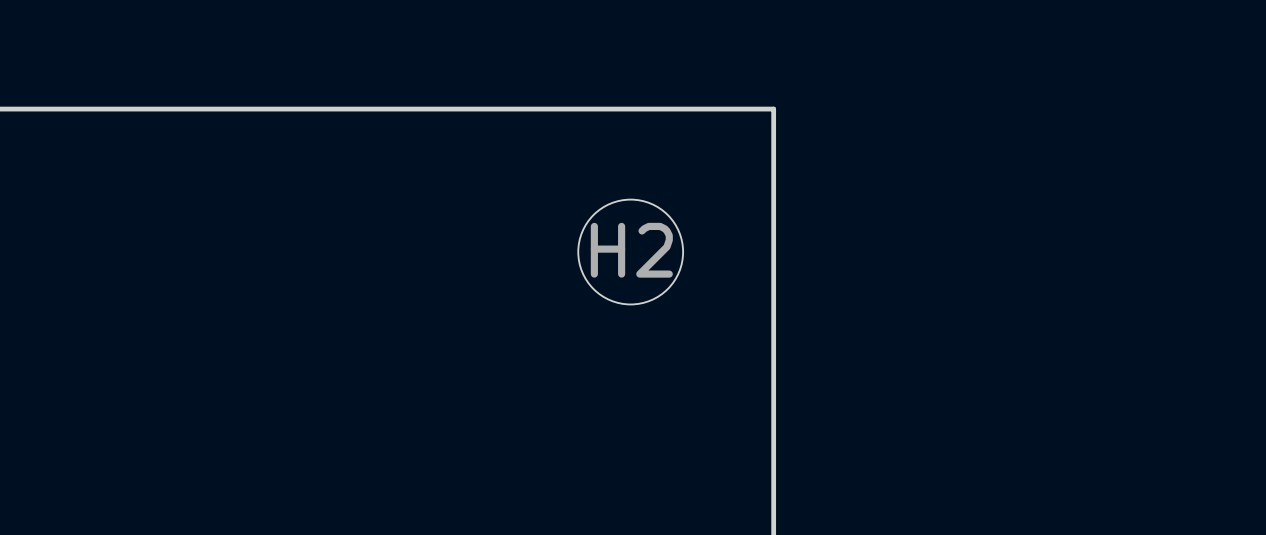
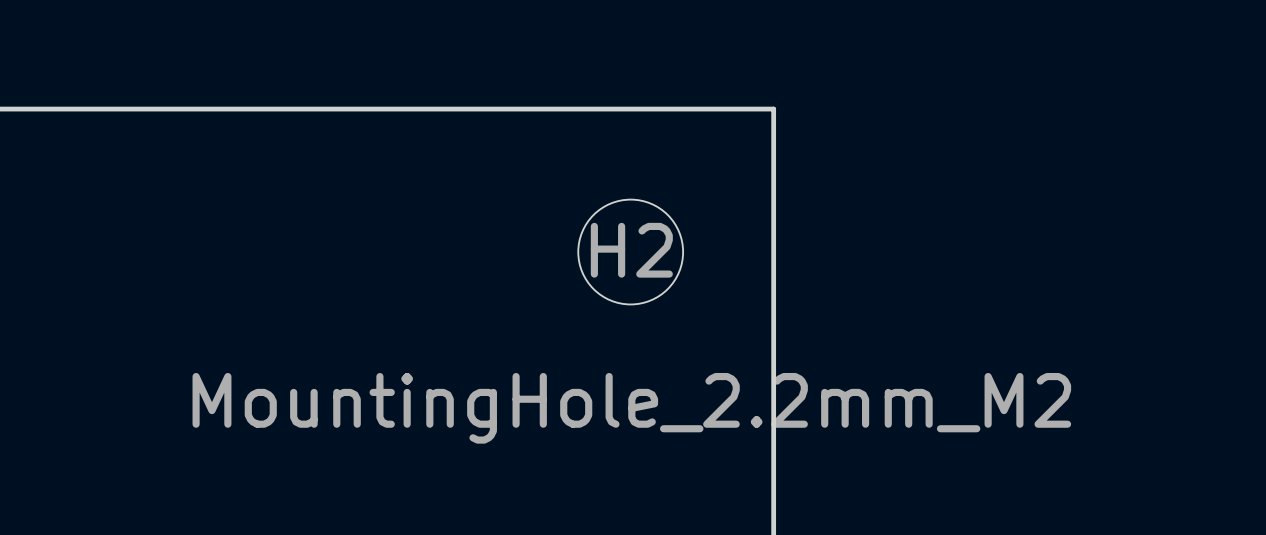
H2 value: none -> MountingHole_2.2mm_M2 (631, 408)

